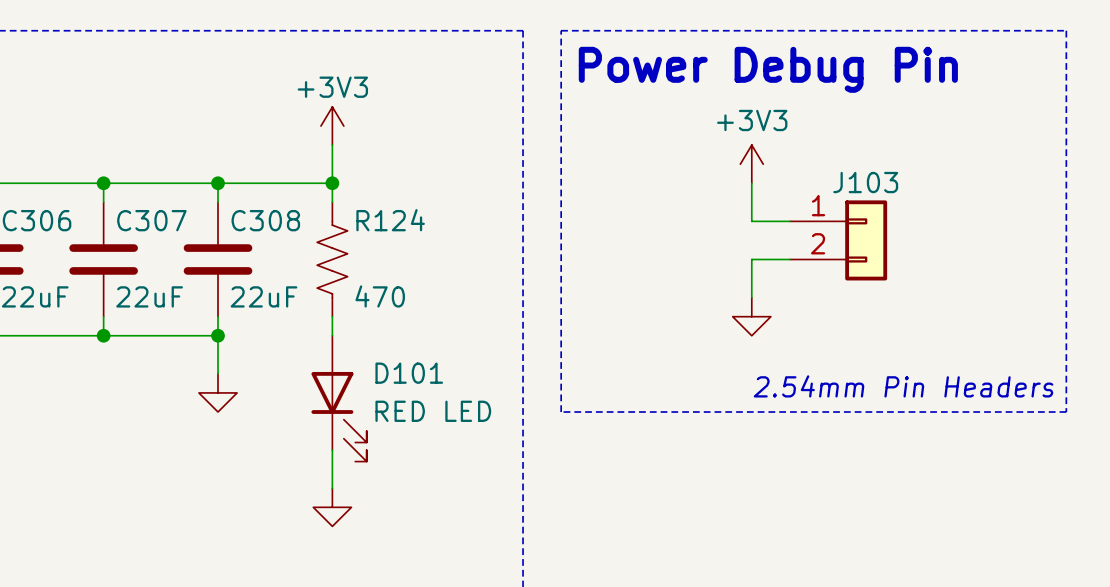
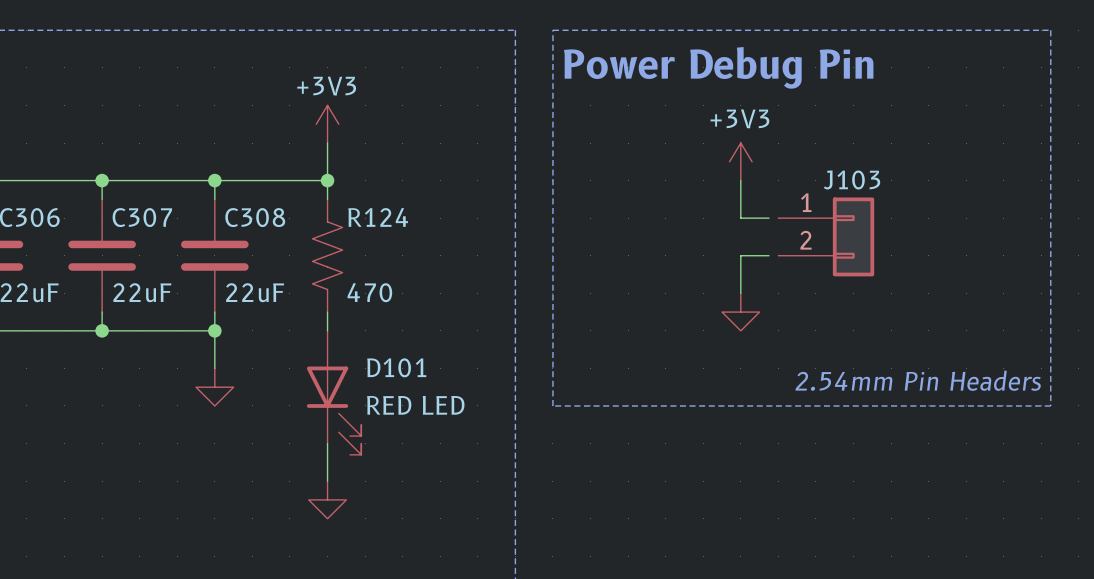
wire: (780, 221) (789, 221) -> none
wire: (780, 259) (789, 259) -> none

